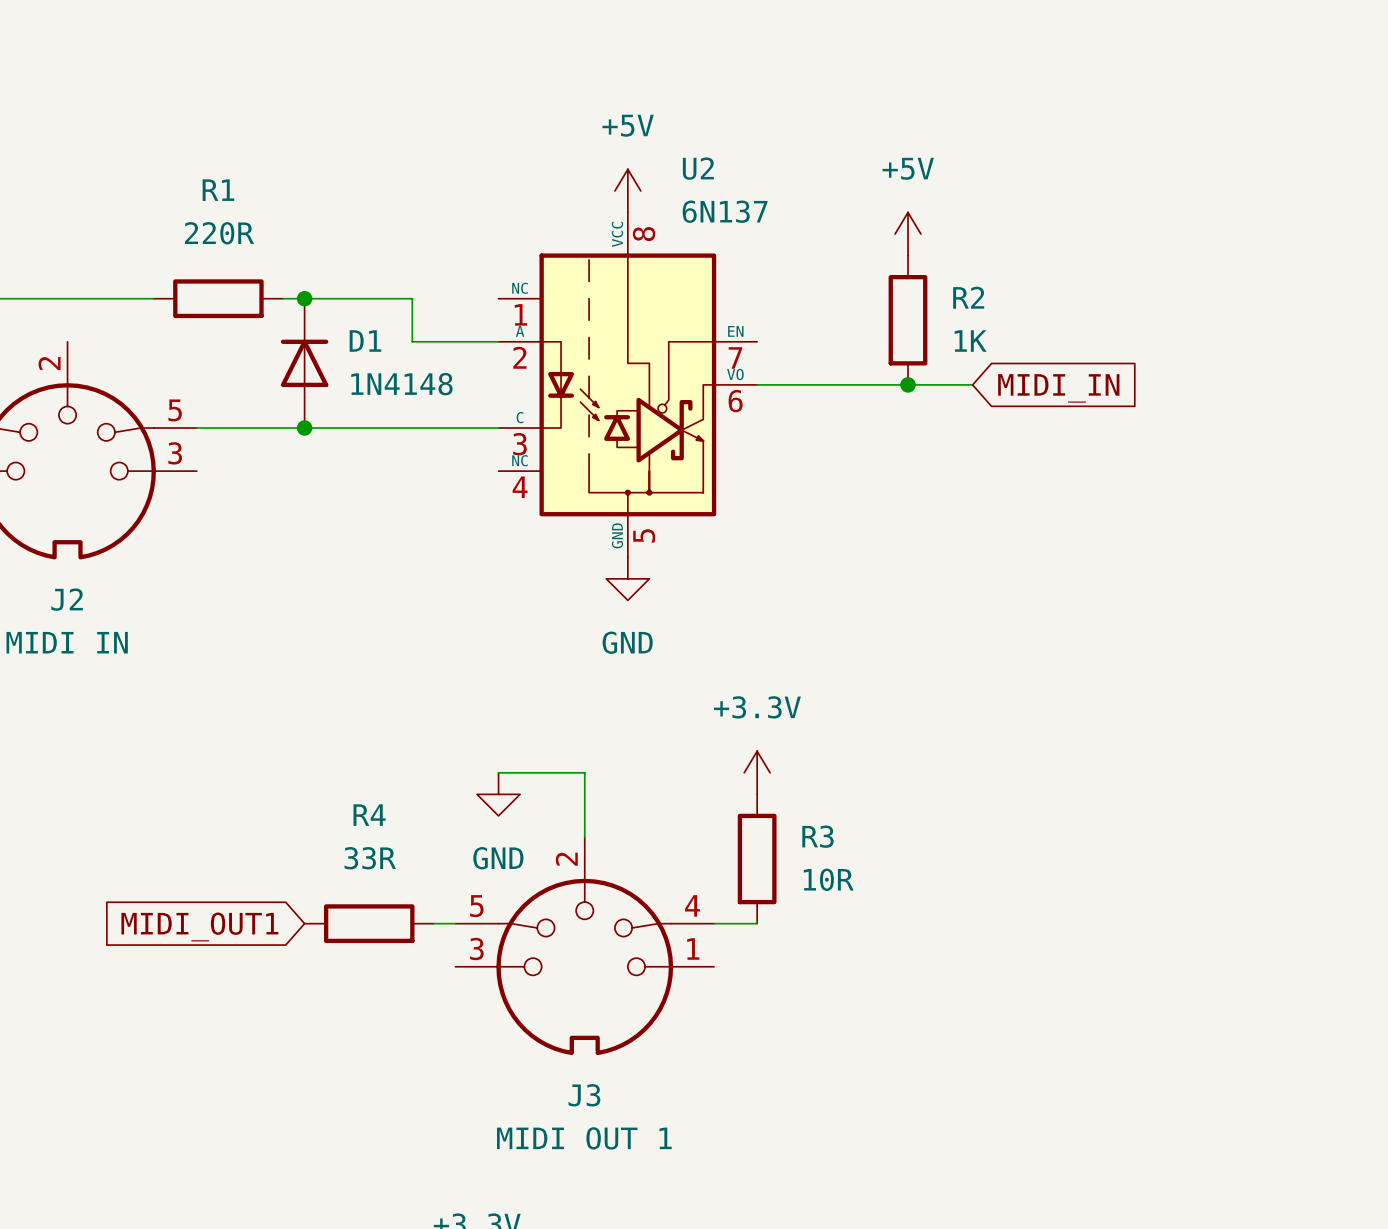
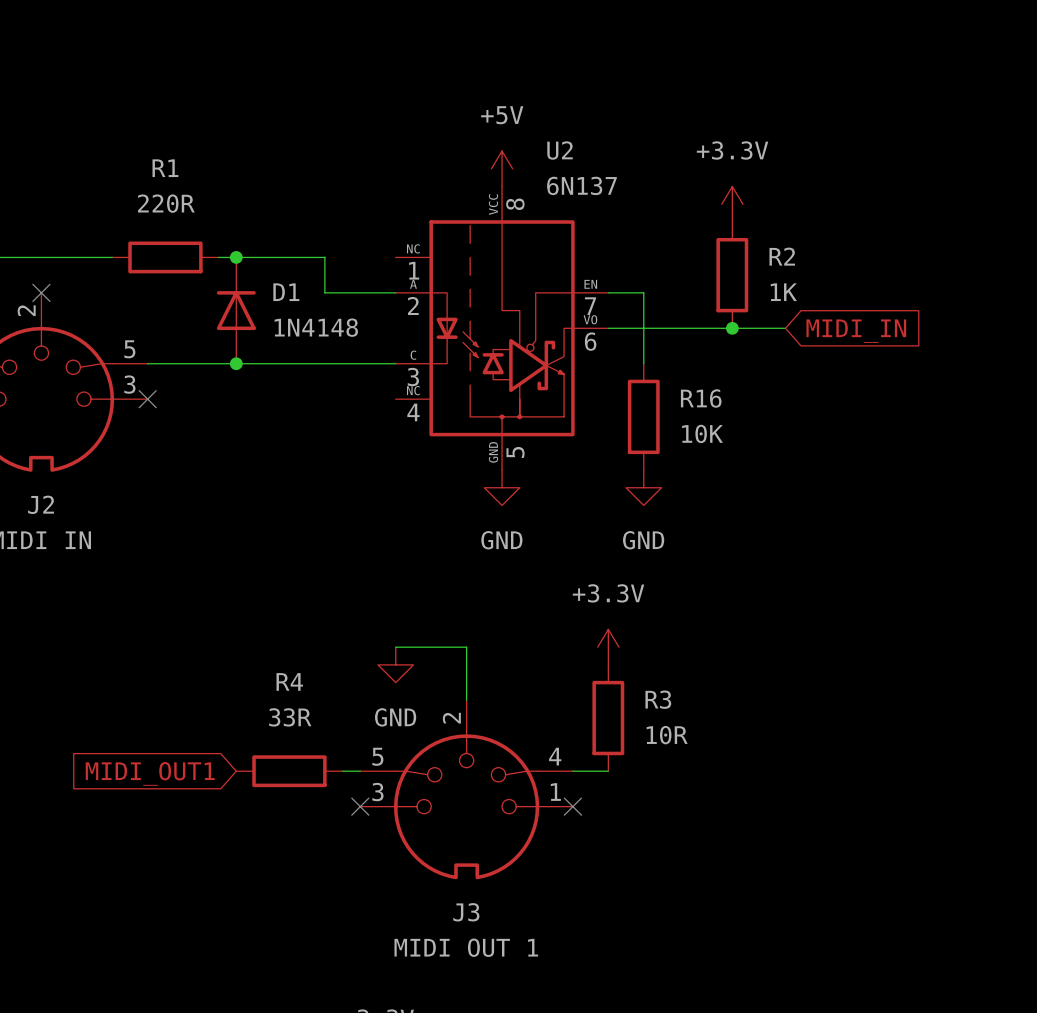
power symbol: +5V (908, 234) -> +3.3V (732, 204)
no-connect mark: none -> (41, 292)
wire: none -> (608, 292) (643, 292) (643, 363)
no-connect mark: none -> (147, 399)
R16: none -> 10K (643, 416)
power symbol: none -> GND (643, 487)
no-connect mark: none -> (360, 806)
no-connect mark: none -> (572, 806)

